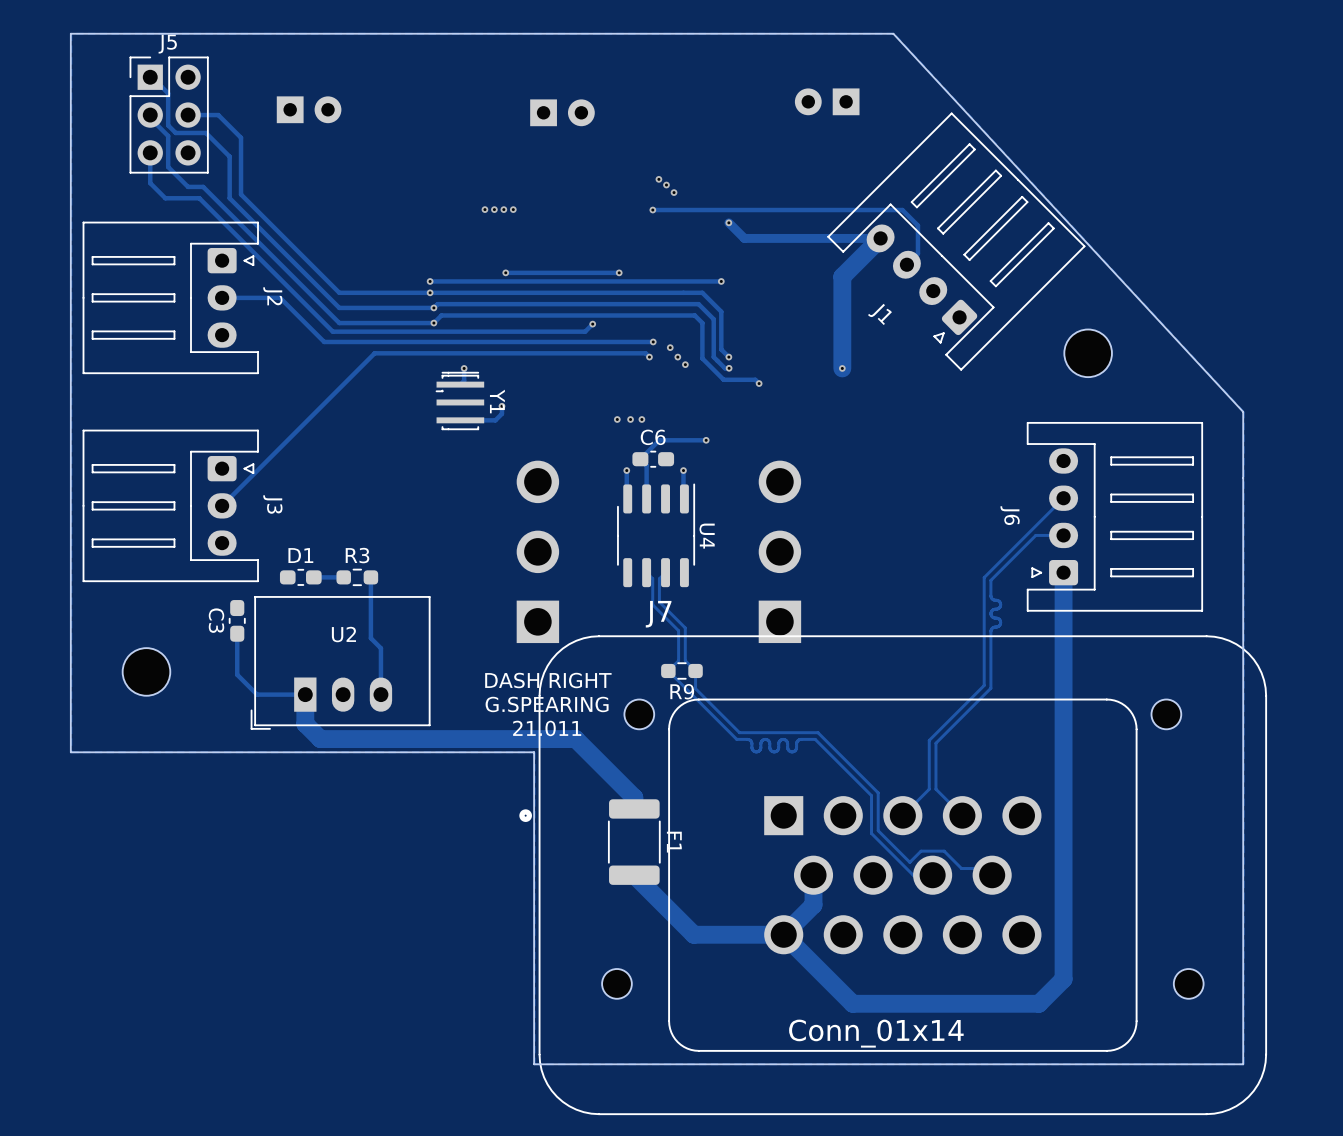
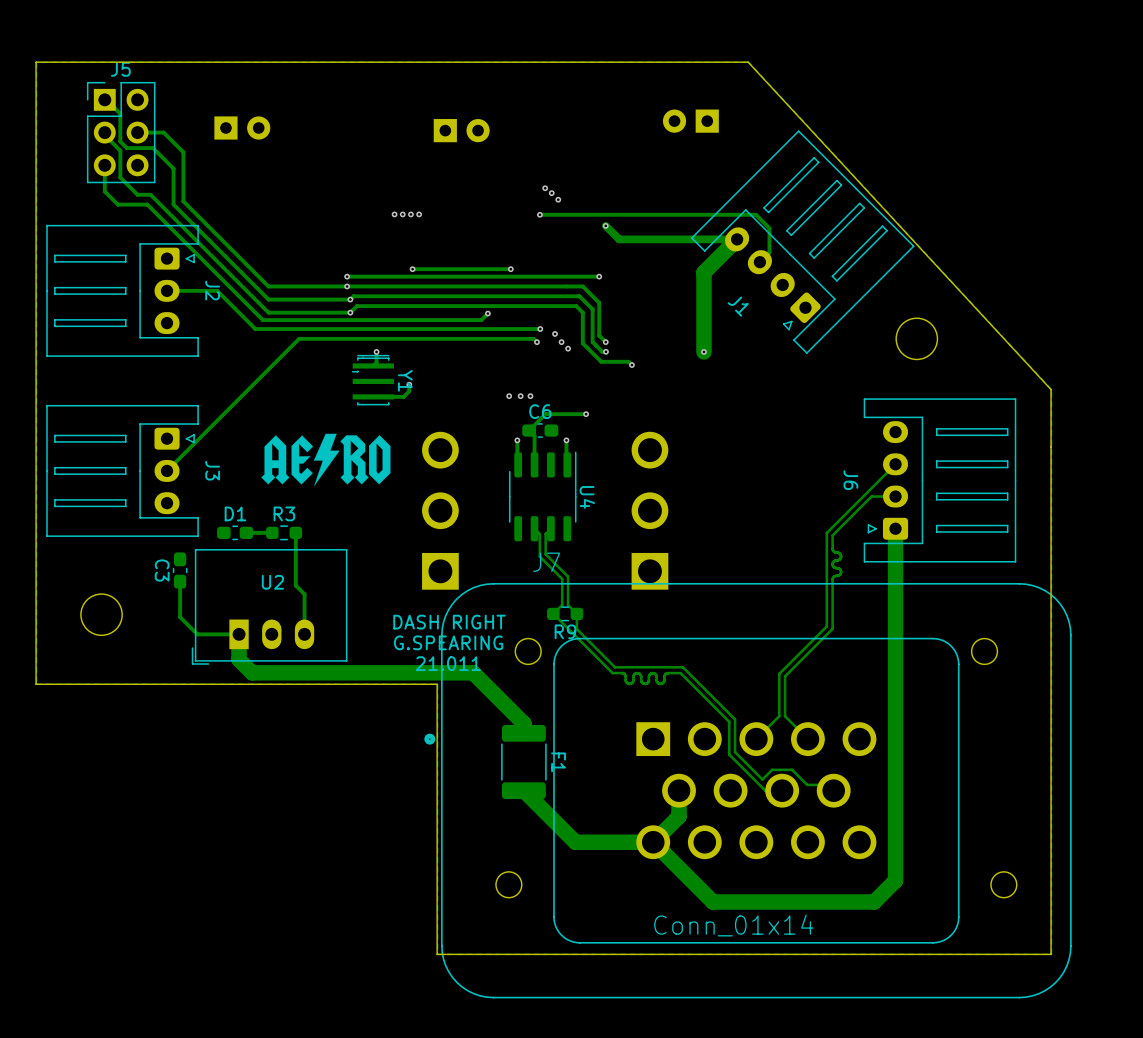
drawing: none -> [261, 433, 391, 487]

